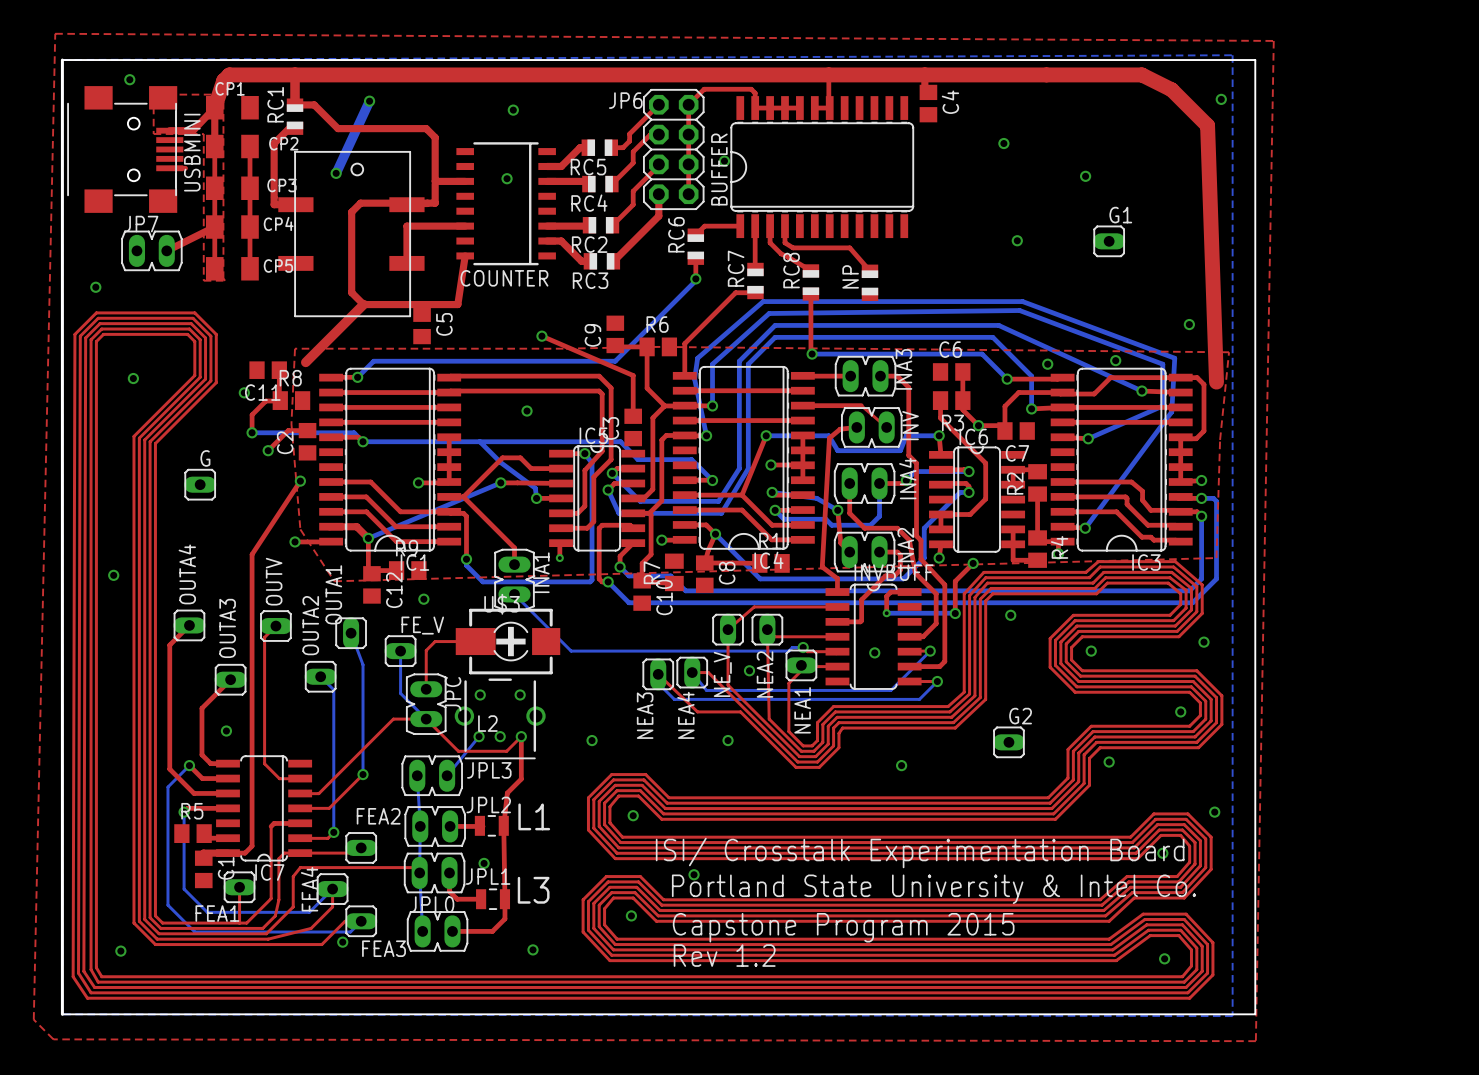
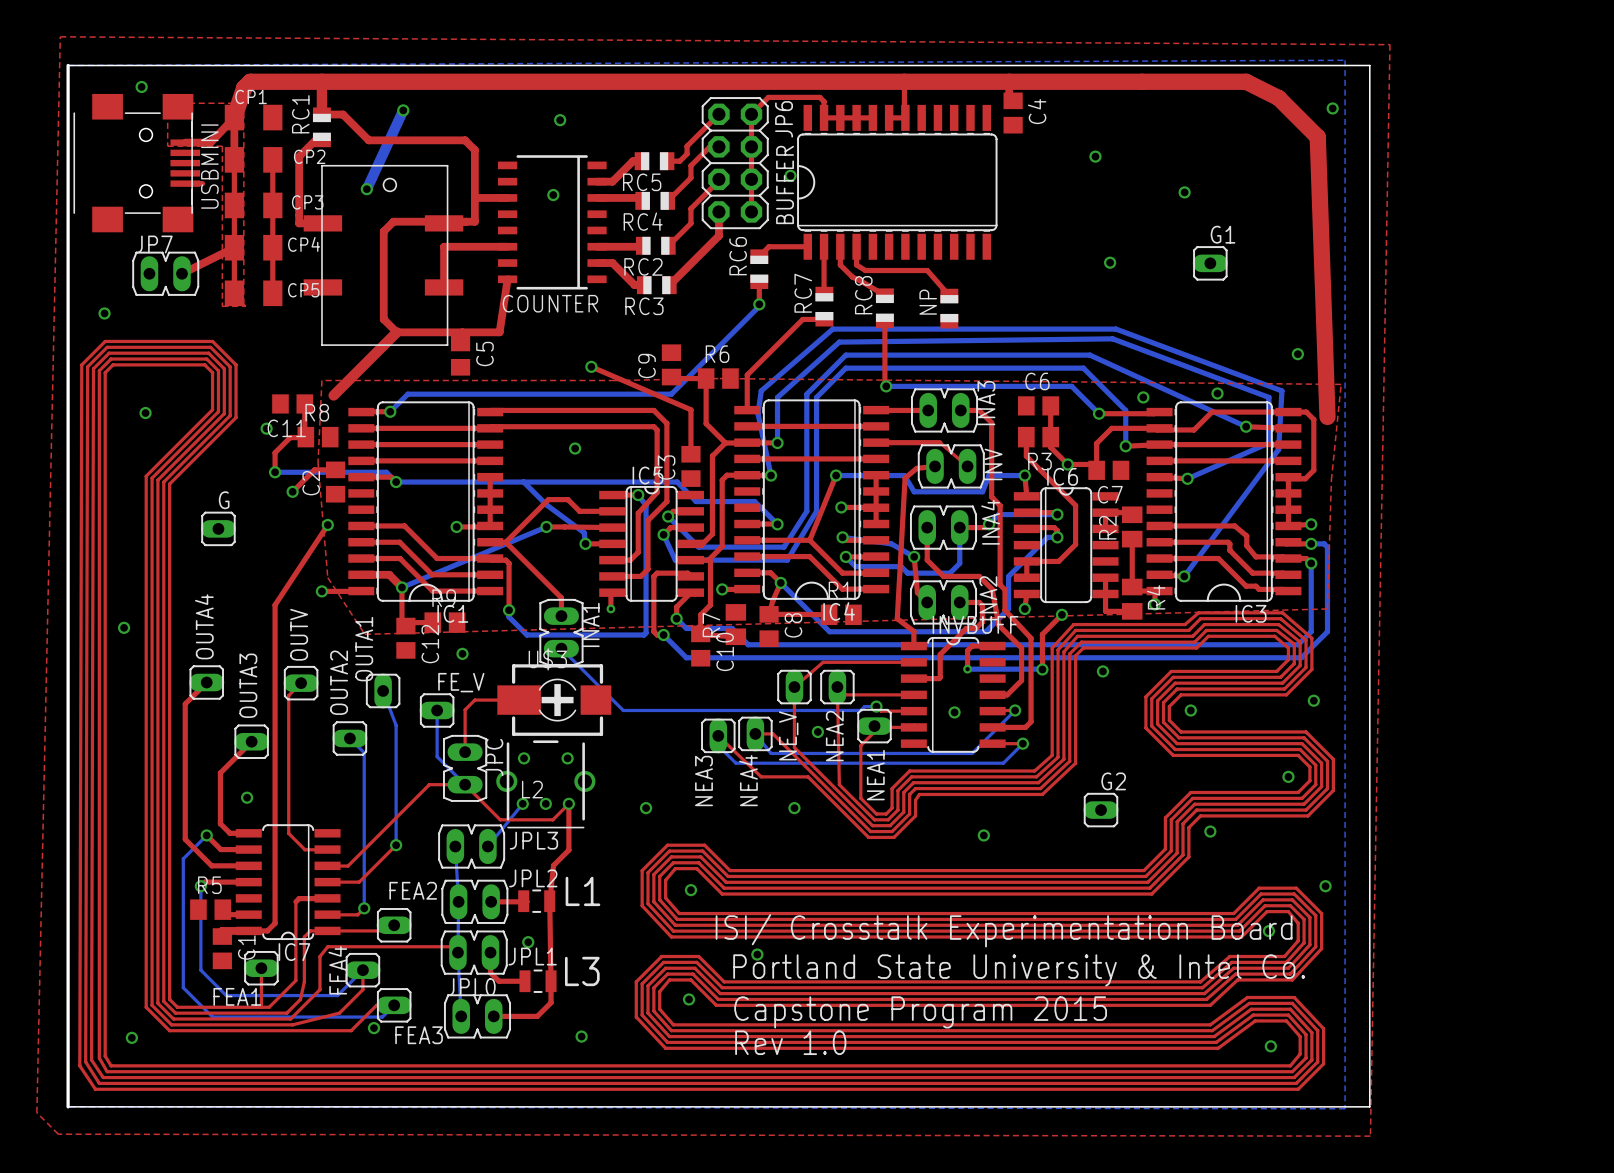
JP6 name rotation: 0° (625, 100) -> 90° counterclockwise (784, 119)
JP6 name position: JP6 (625, 100) -> JP6 (784, 119)
text: Rev 1.2 (724, 955) -> Rev 1.0 (790, 1042)

